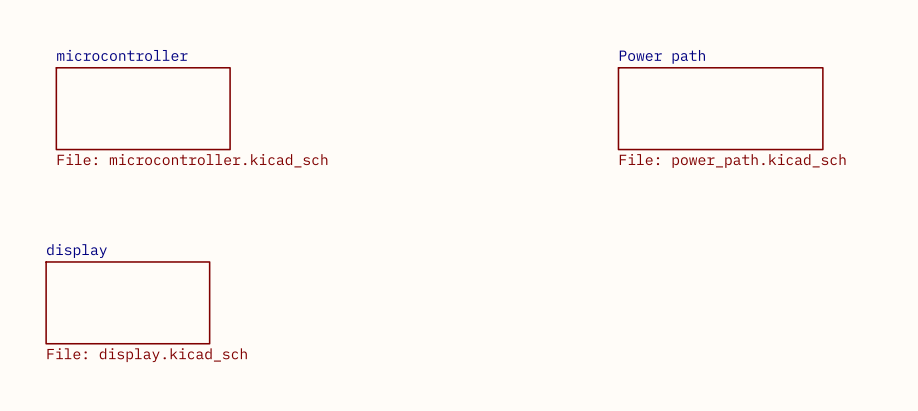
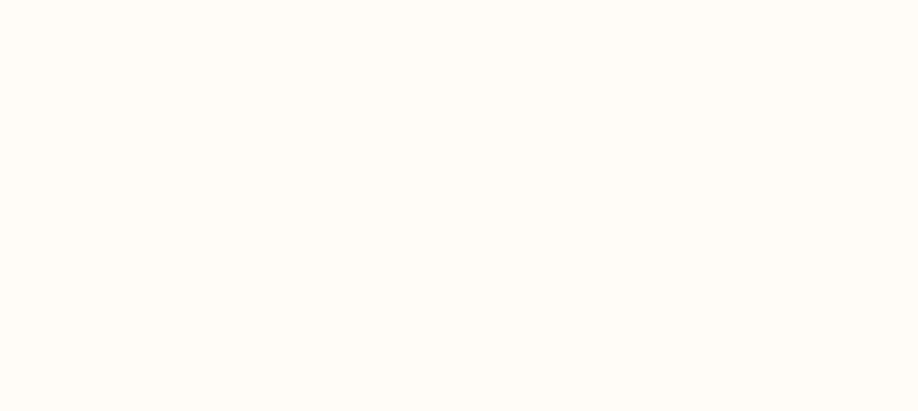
sheet microcontroller: File: microcontroller.kicad_sch (143, 108) -> none
sheet Power path: File: power_path.kicad_sch (720, 108) -> none
sheet display: File: display.kicad_sch (127, 302) -> none

